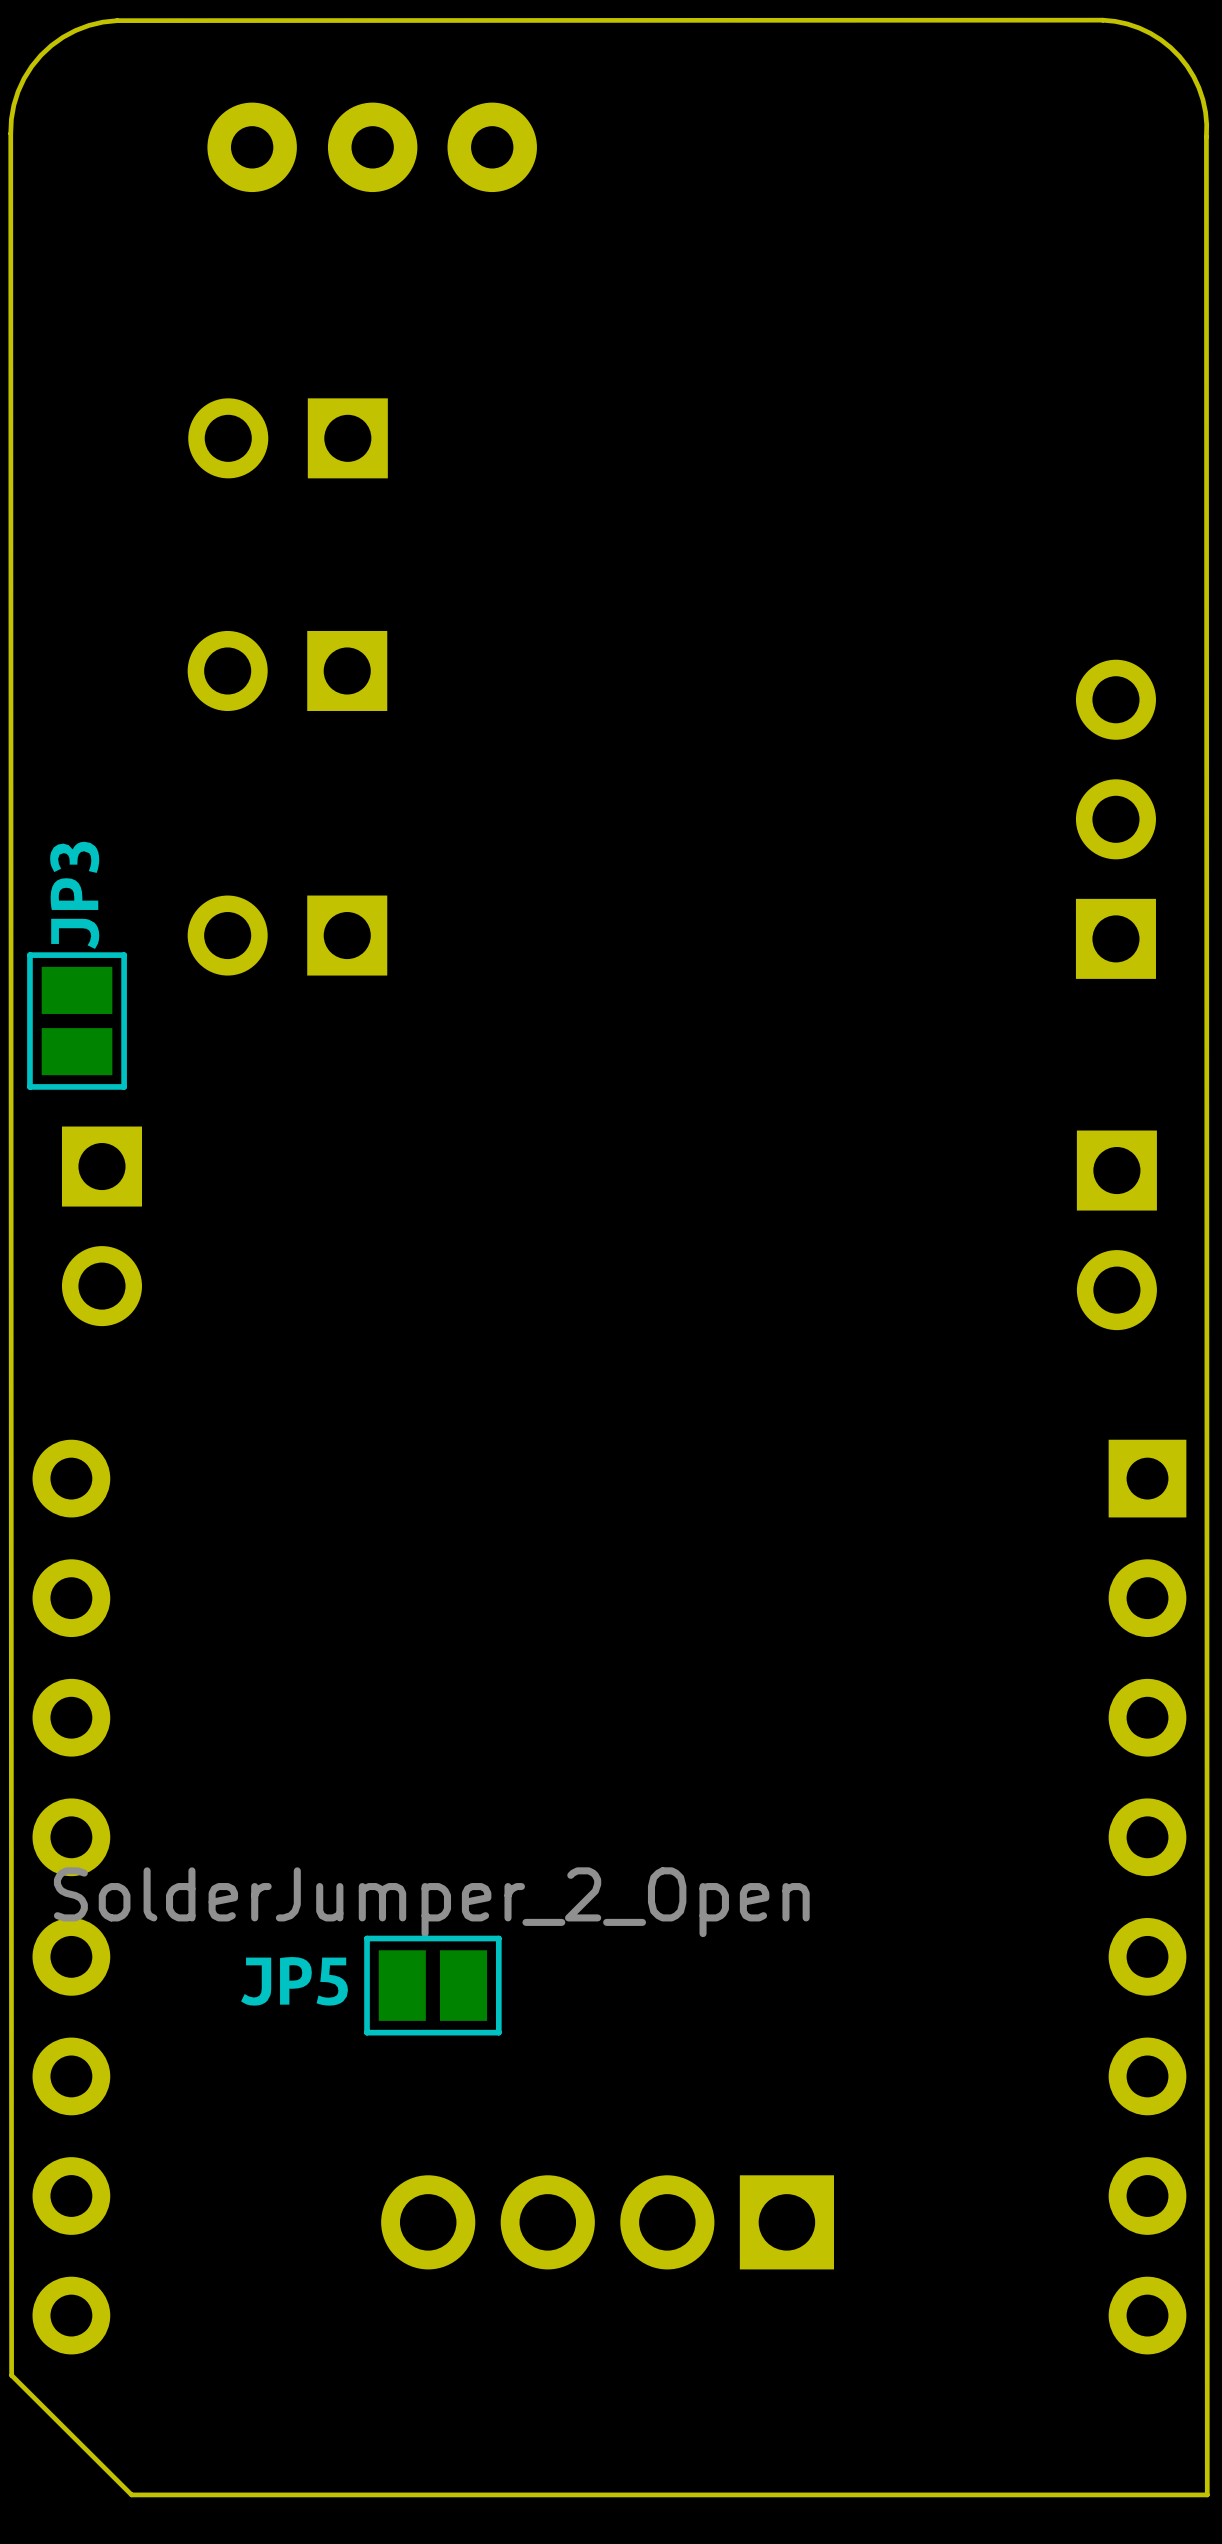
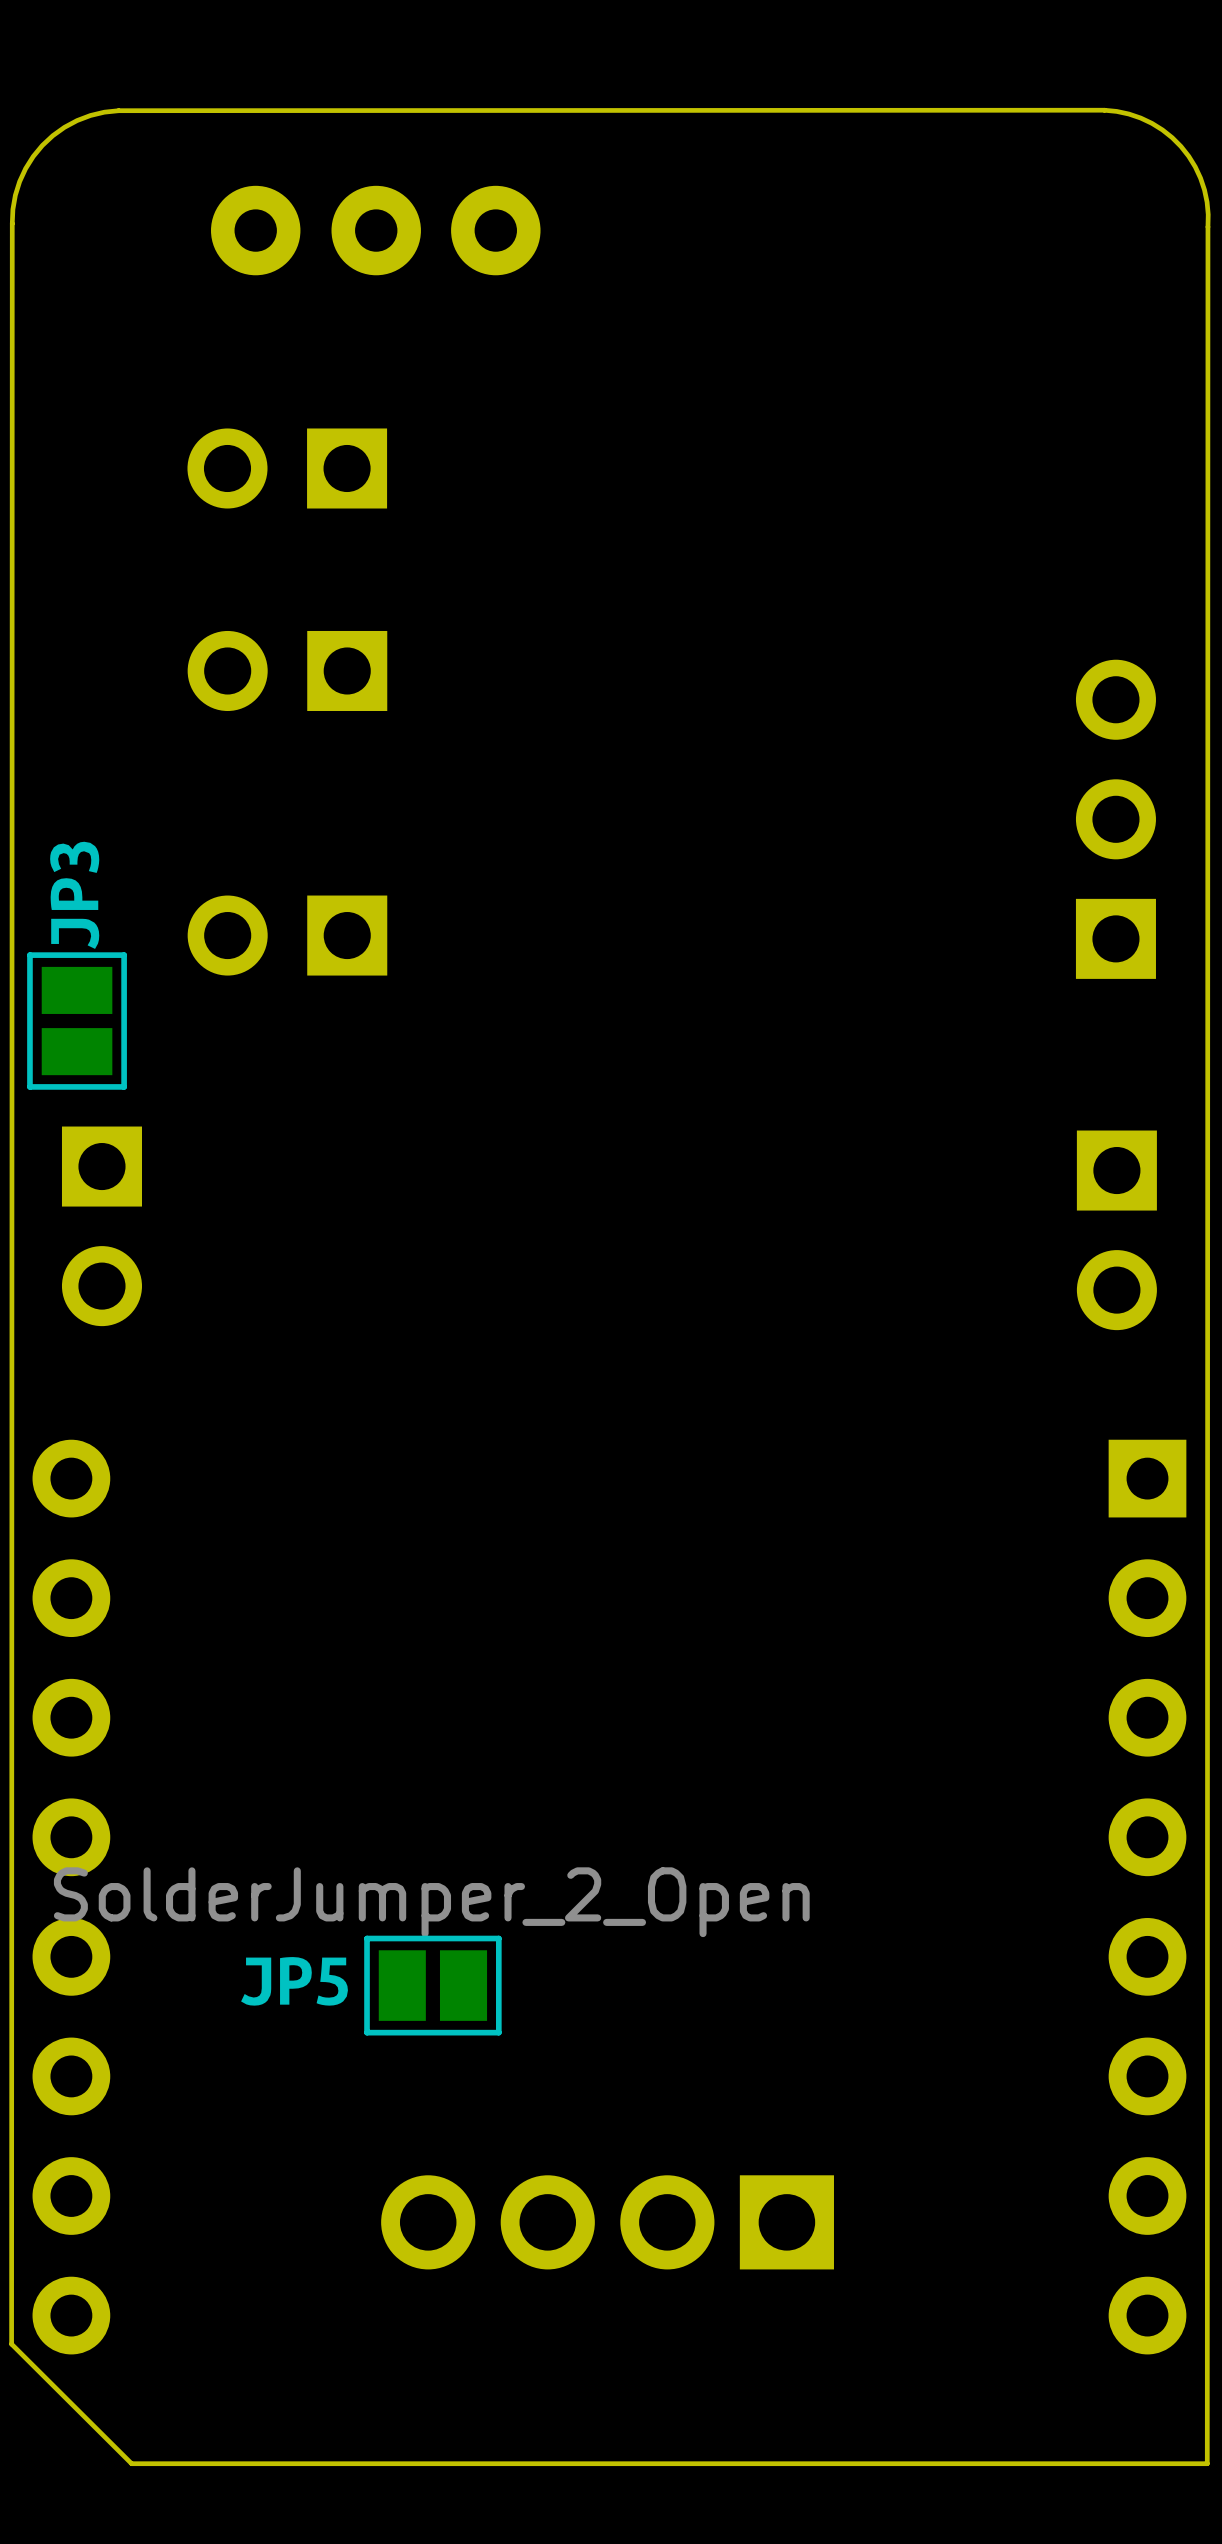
board edge: (1102, 20) (117, 20) (88, 25) (62, 37) (40, 55) (31, 66) (18, 91) (13, 105) (10, 133) (11, 2375) (131, 2494) (1207, 2494) (1206, 124) (1199, 88) (1179, 56) (1161, 39) (1139, 28) (1102, 20) -> (1104, 110) (1128, 114) (1151, 123) (1181, 146) (1200, 178) (1208, 214) (1207, 2463) (131, 2463) (11, 2344) (12, 223) (15, 195) (19, 181) (33, 156) (42, 145) (64, 127) (90, 115) (118, 110) (1104, 110)
part position: (372, 147) -> (375, 230)
part position: (288, 438) -> (287, 468)

